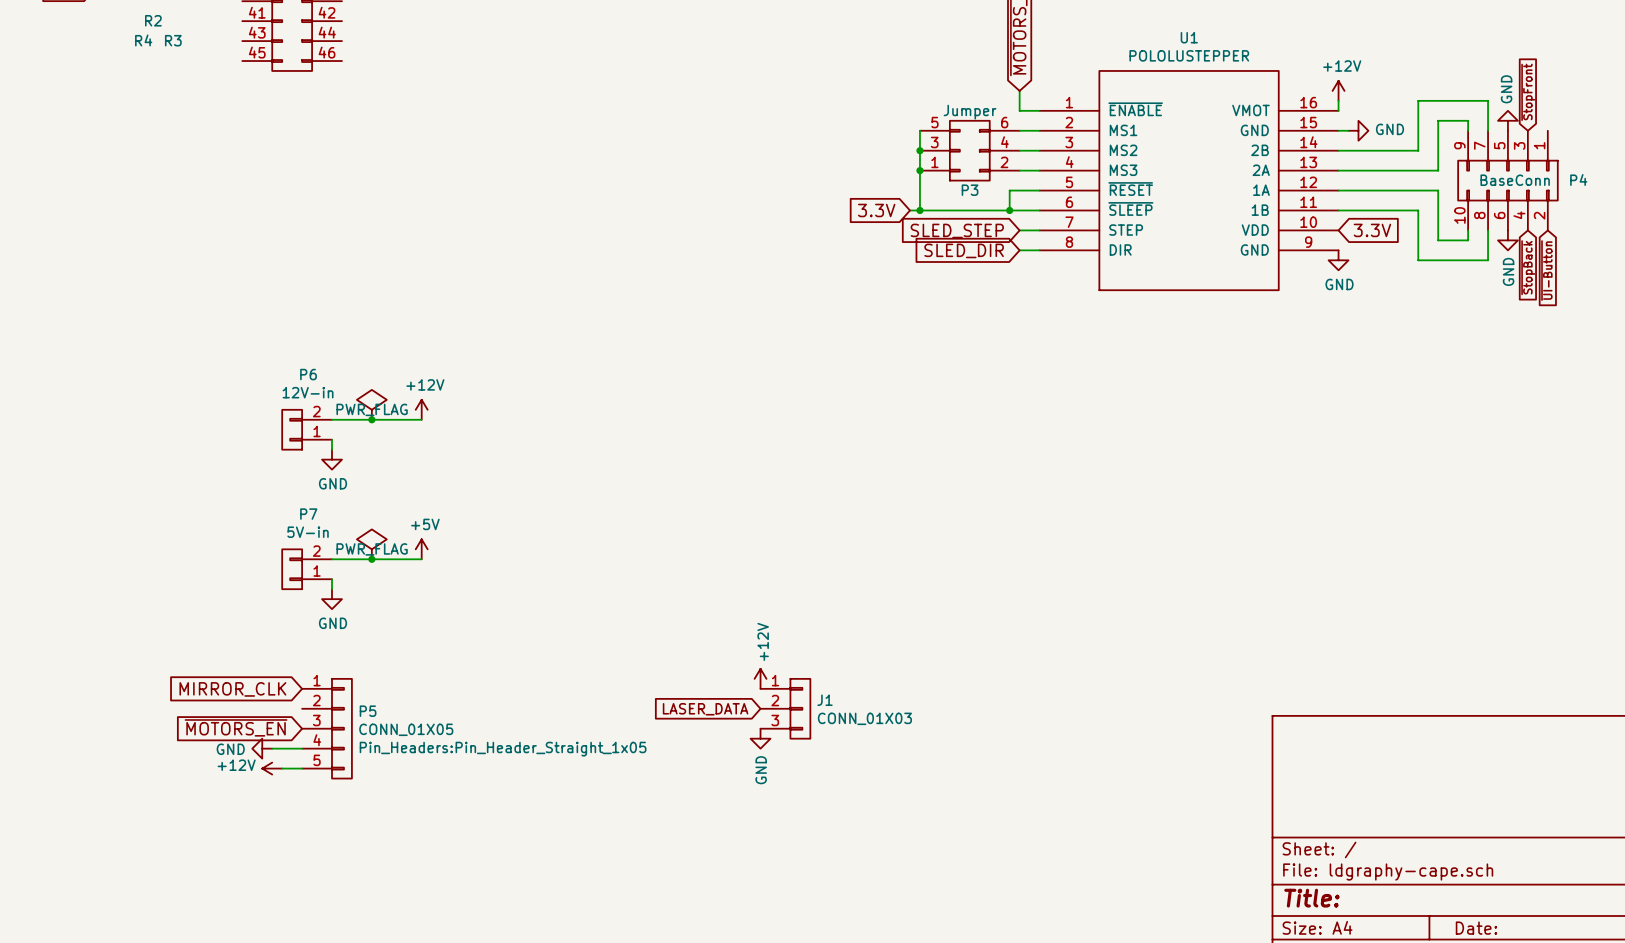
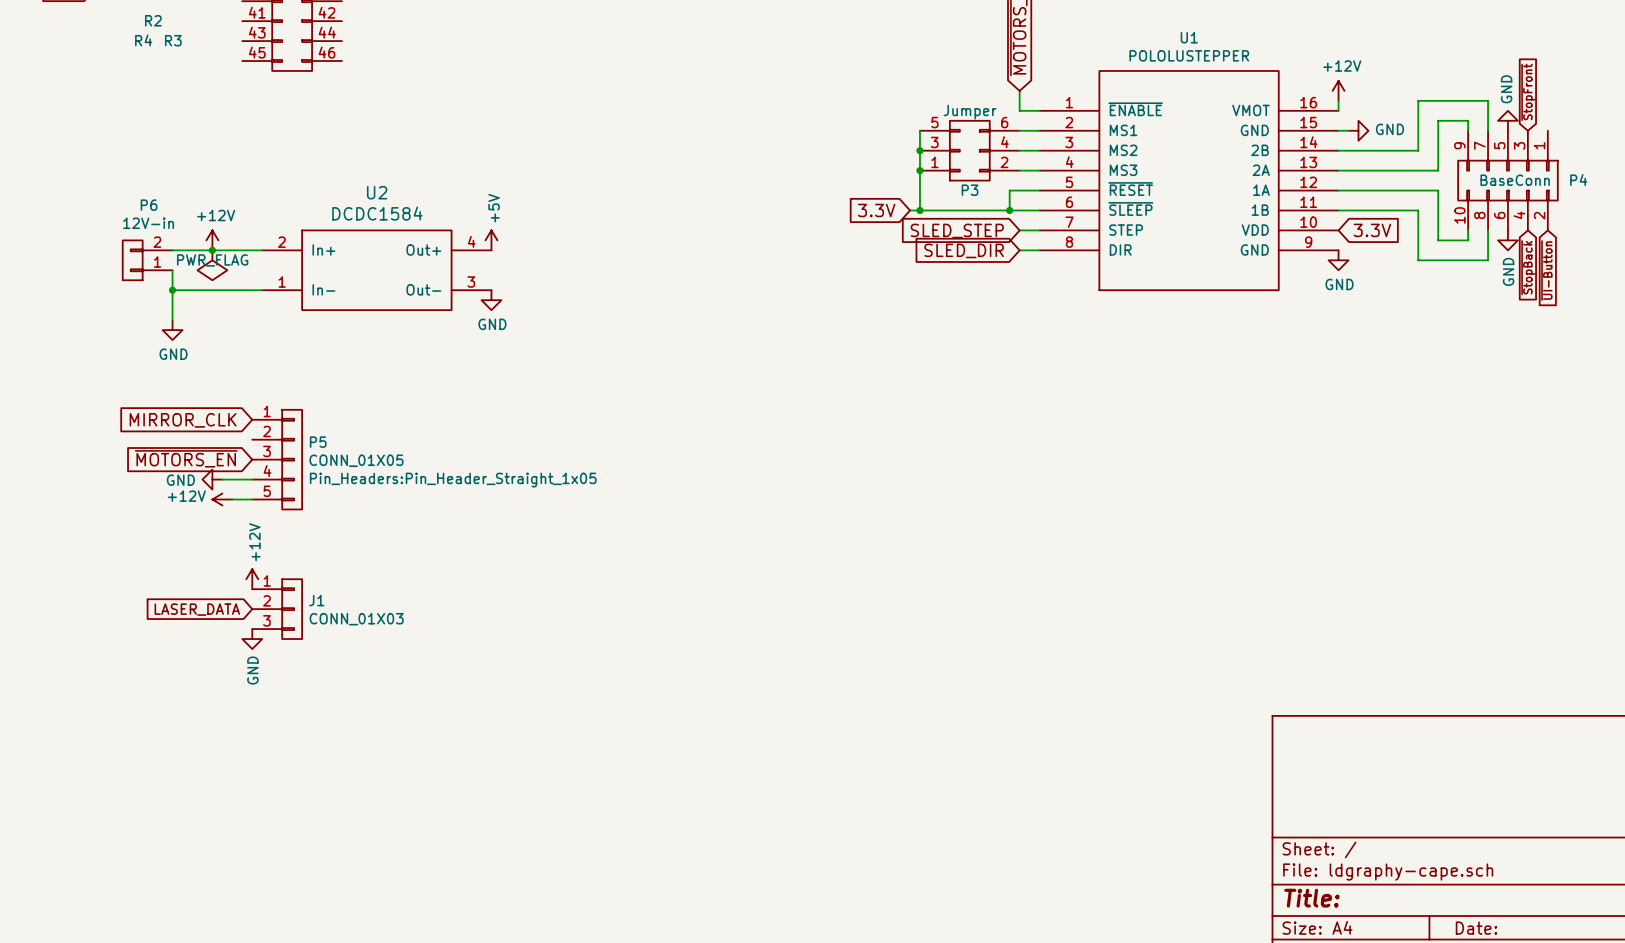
power symbol: none -> +12V (212, 240)
power symbol: none -> +5V (491, 240)
wire: none -> (172, 250) (262, 250)
junction: none -> (212, 250)
power symbol: none -> PWR_FLAG (212, 265)
wire: none -> (172, 270) (172, 320)
U2: none -> DCDC1584 (376, 270)
wire: none -> (172, 290) (262, 290)
junction: none -> (172, 290)
power symbol: none -> GND (491, 300)
power symbol: none -> GND (172, 330)
power symbol: PWR_FLAG (371, 404) -> none
power symbol: +12V (421, 409) -> none
wire: (332, 419) (421, 419) -> none
junction: (371, 419) -> none
global label: none -> MIRROR_CLK (183, 420)
P6 position: (307, 429) -> (147, 260)
wire: (332, 439) (332, 449) -> none
global label: none -> ~{MOTORS_EN} (186, 458)
power symbol: GND (332, 459) -> none
power symbol: none -> GND (212, 479)
wire: none -> (222, 479) (252, 479)
power symbol: none -> +12V (222, 499)
wire: none -> (232, 499) (252, 499)
power symbol: PWR_FLAG (371, 544) -> none
power symbol: +5V (421, 549) -> none
wire: (332, 559) (421, 559) -> none
junction: (371, 559) -> none
P7: 5V-in (307, 569) -> none
power symbol: none -> +12V (252, 579)
wire: (332, 579) (332, 589) -> none
power symbol: GND (332, 599) -> none
global label: none -> LASER_DATA (197, 609)
power symbol: none -> GND (252, 639)
power symbol: +12V (760, 678) -> none
global label: MIRROR_CLK (232, 689) -> none
J1 position: (785, 708) -> (277, 609)
global label: LASER_DATA (705, 709) -> none
global label: ~{MOTORS_EN} (236, 727) -> none
P5 position: (327, 728) -> (277, 459)
power symbol: GND (760, 738) -> none
power symbol: GND (262, 748) -> none
wire: (272, 748) (302, 748) -> none
power symbol: +12V (272, 768) -> none
wire: (282, 768) (302, 768) -> none

